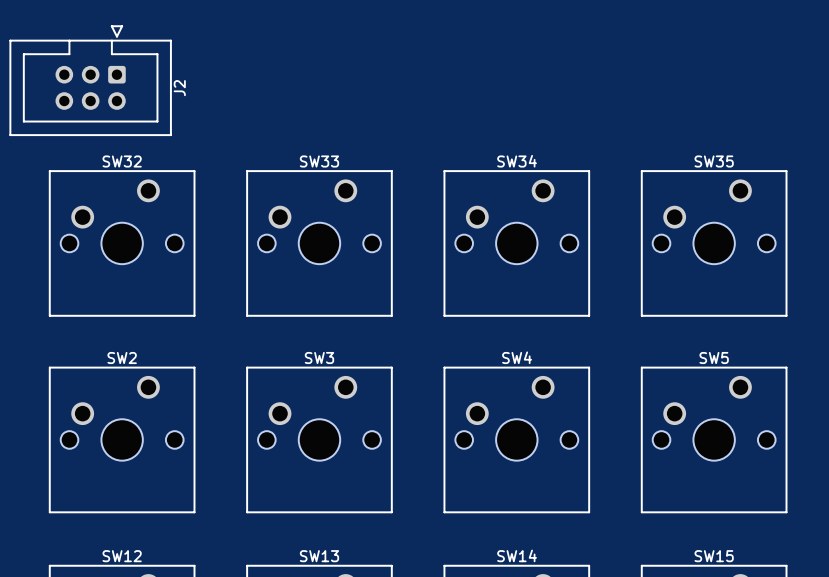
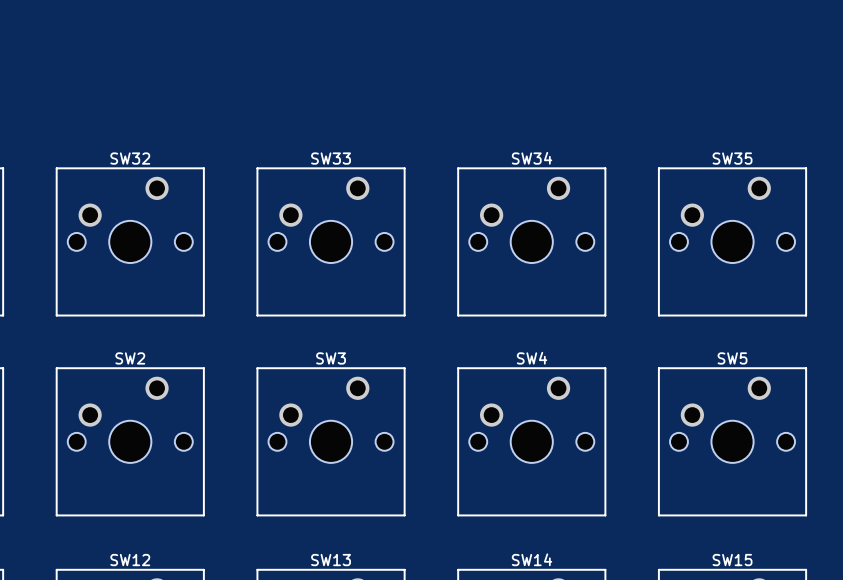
J2: (90, 80) -> none

